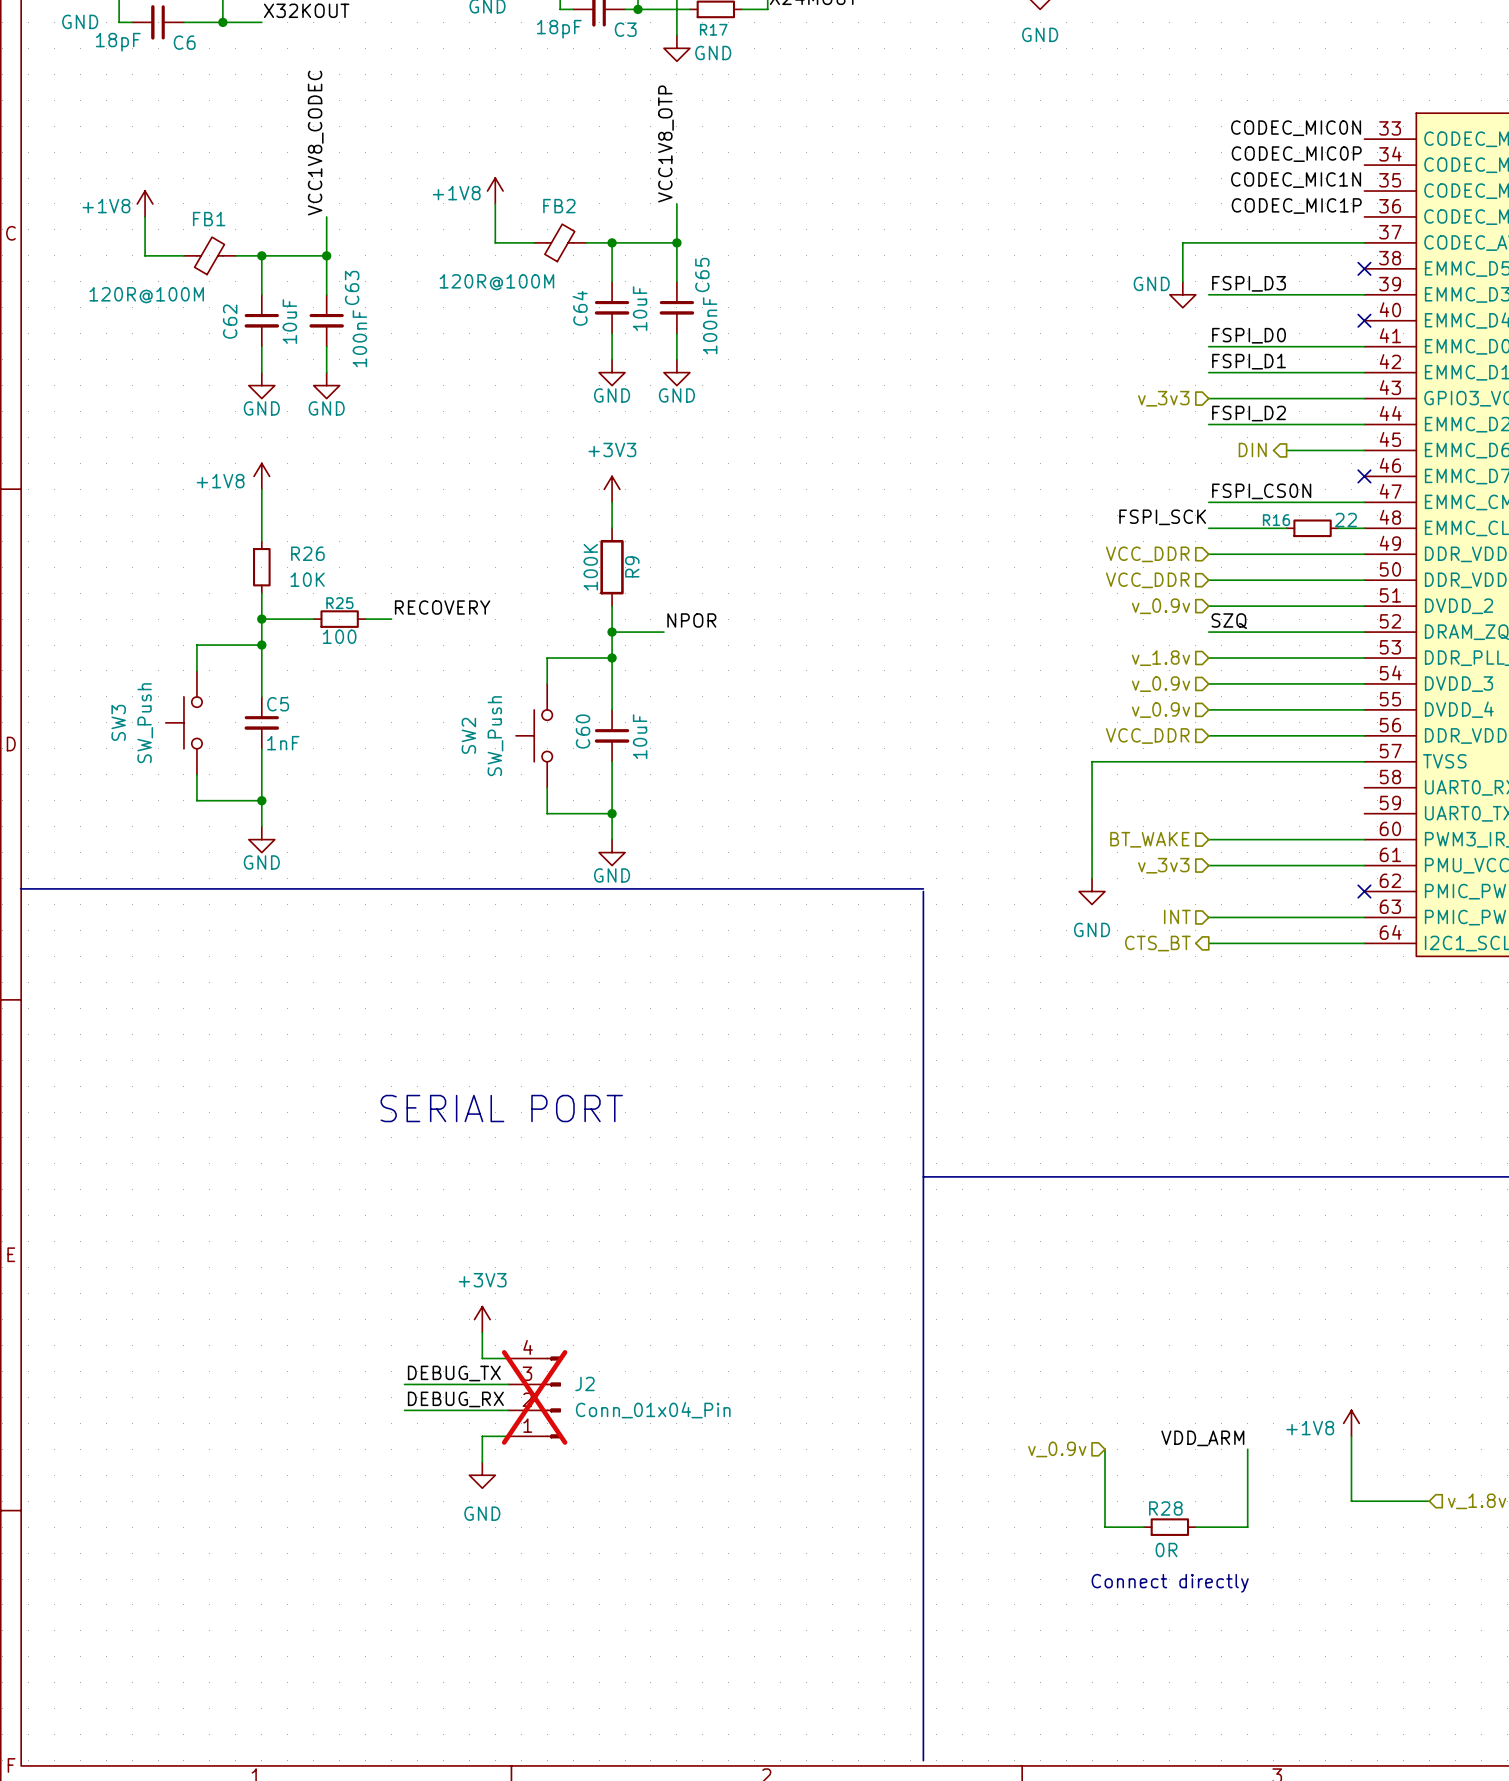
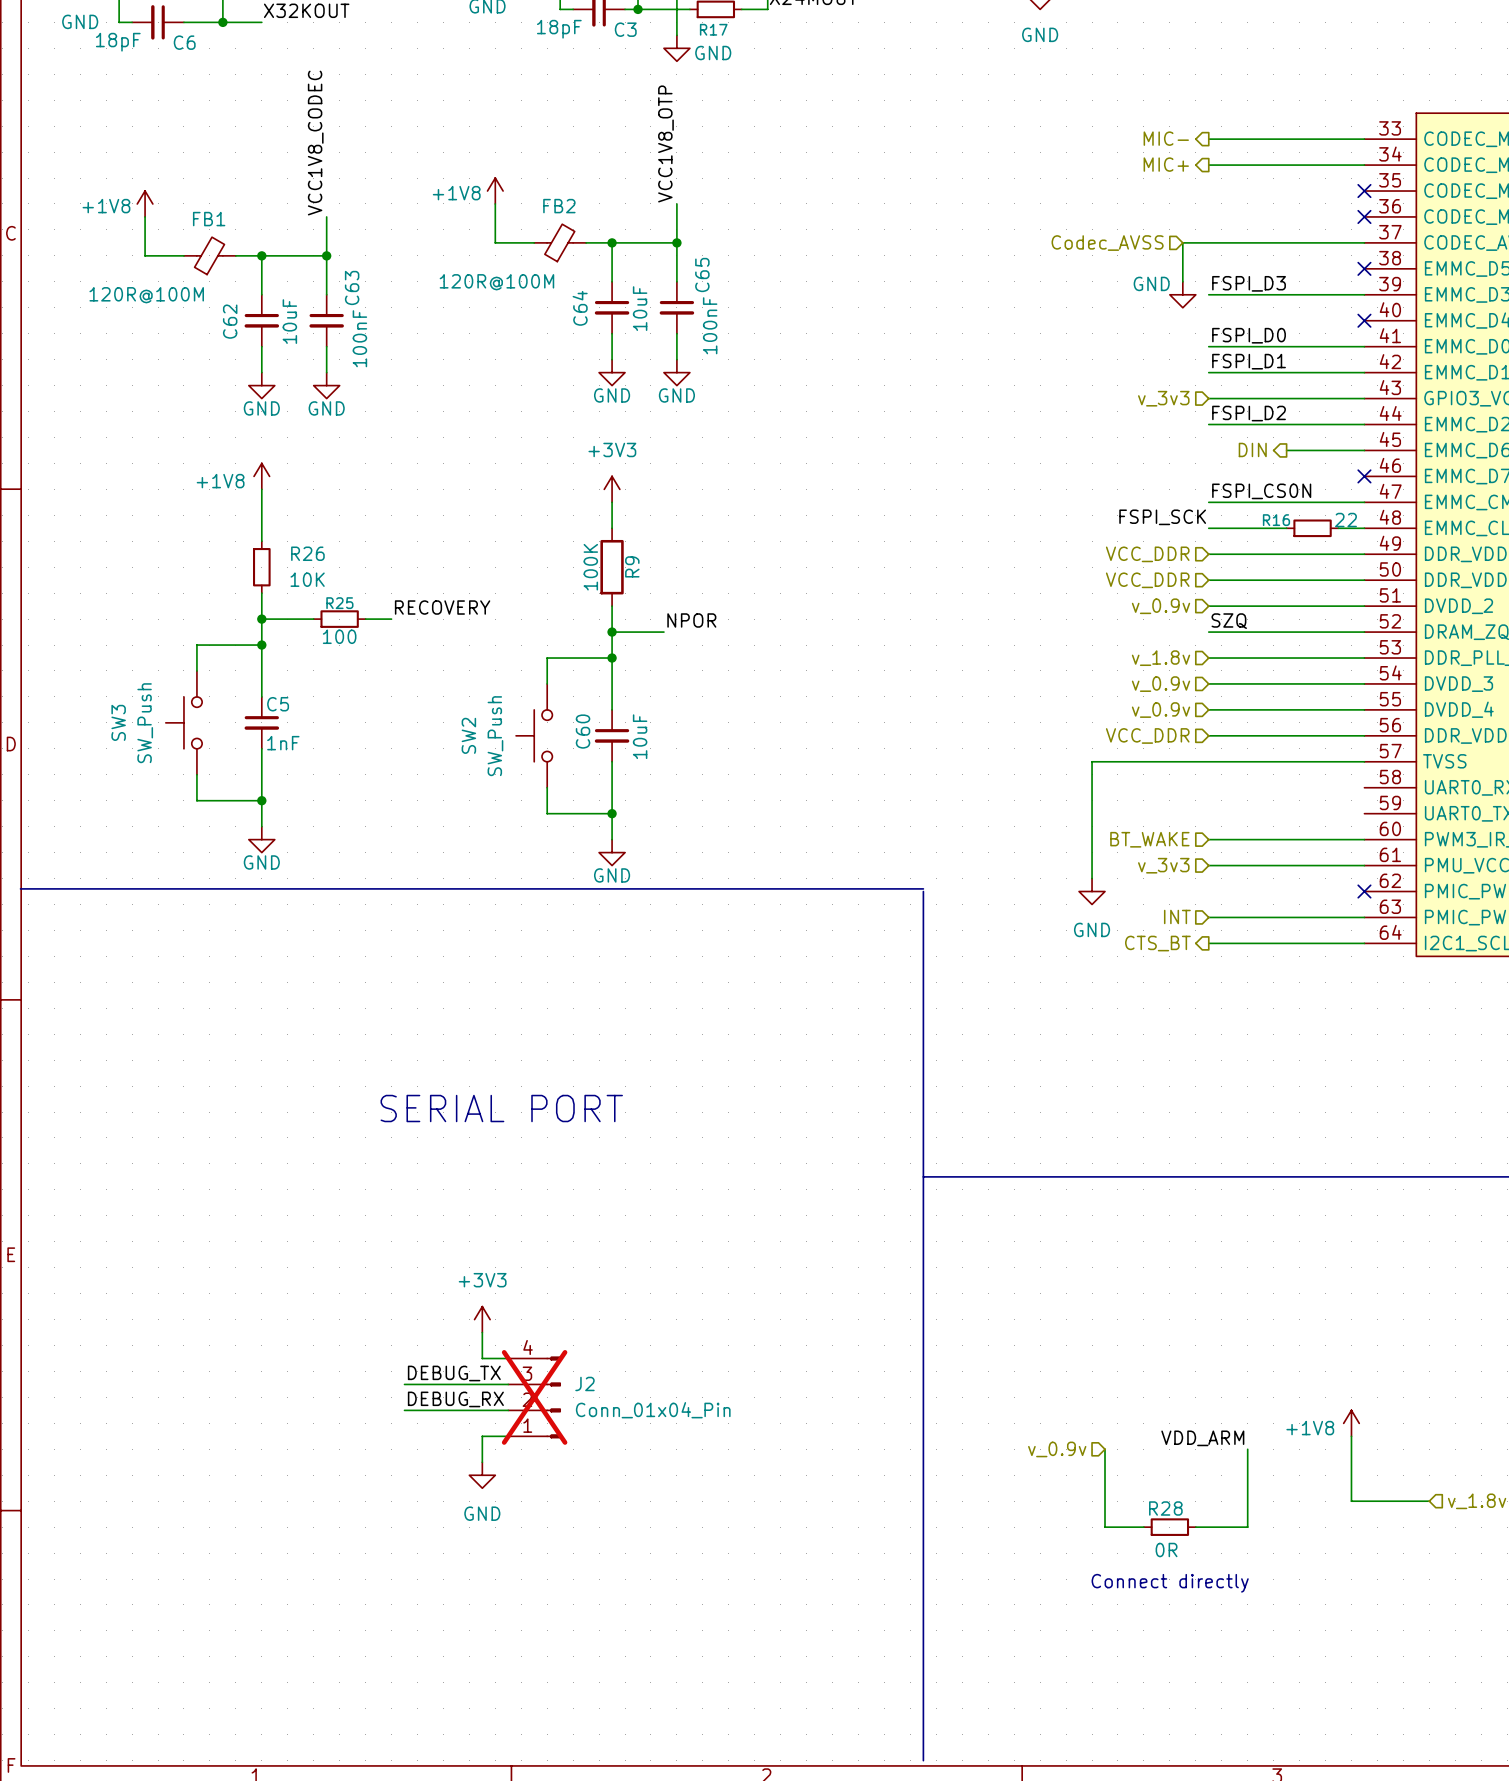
label: CODEC_MIC0N (1296, 128) -> none
hierarchical label: none -> MIC- (1166, 138)
wire: none -> (1208, 139) (1364, 139)
label: CODEC_MIC0P (1296, 154) -> none
hierarchical label: none -> MIC+ (1166, 164)
wire: none -> (1208, 165) (1364, 165)
label: CODEC_MIC1N (1296, 180) -> none
no-connect mark: none -> (1364, 191)
label: CODEC_MIC1P (1296, 206) -> none
no-connect mark: none -> (1364, 216)
hierarchical label: none -> Codec_AVSS (1107, 243)

